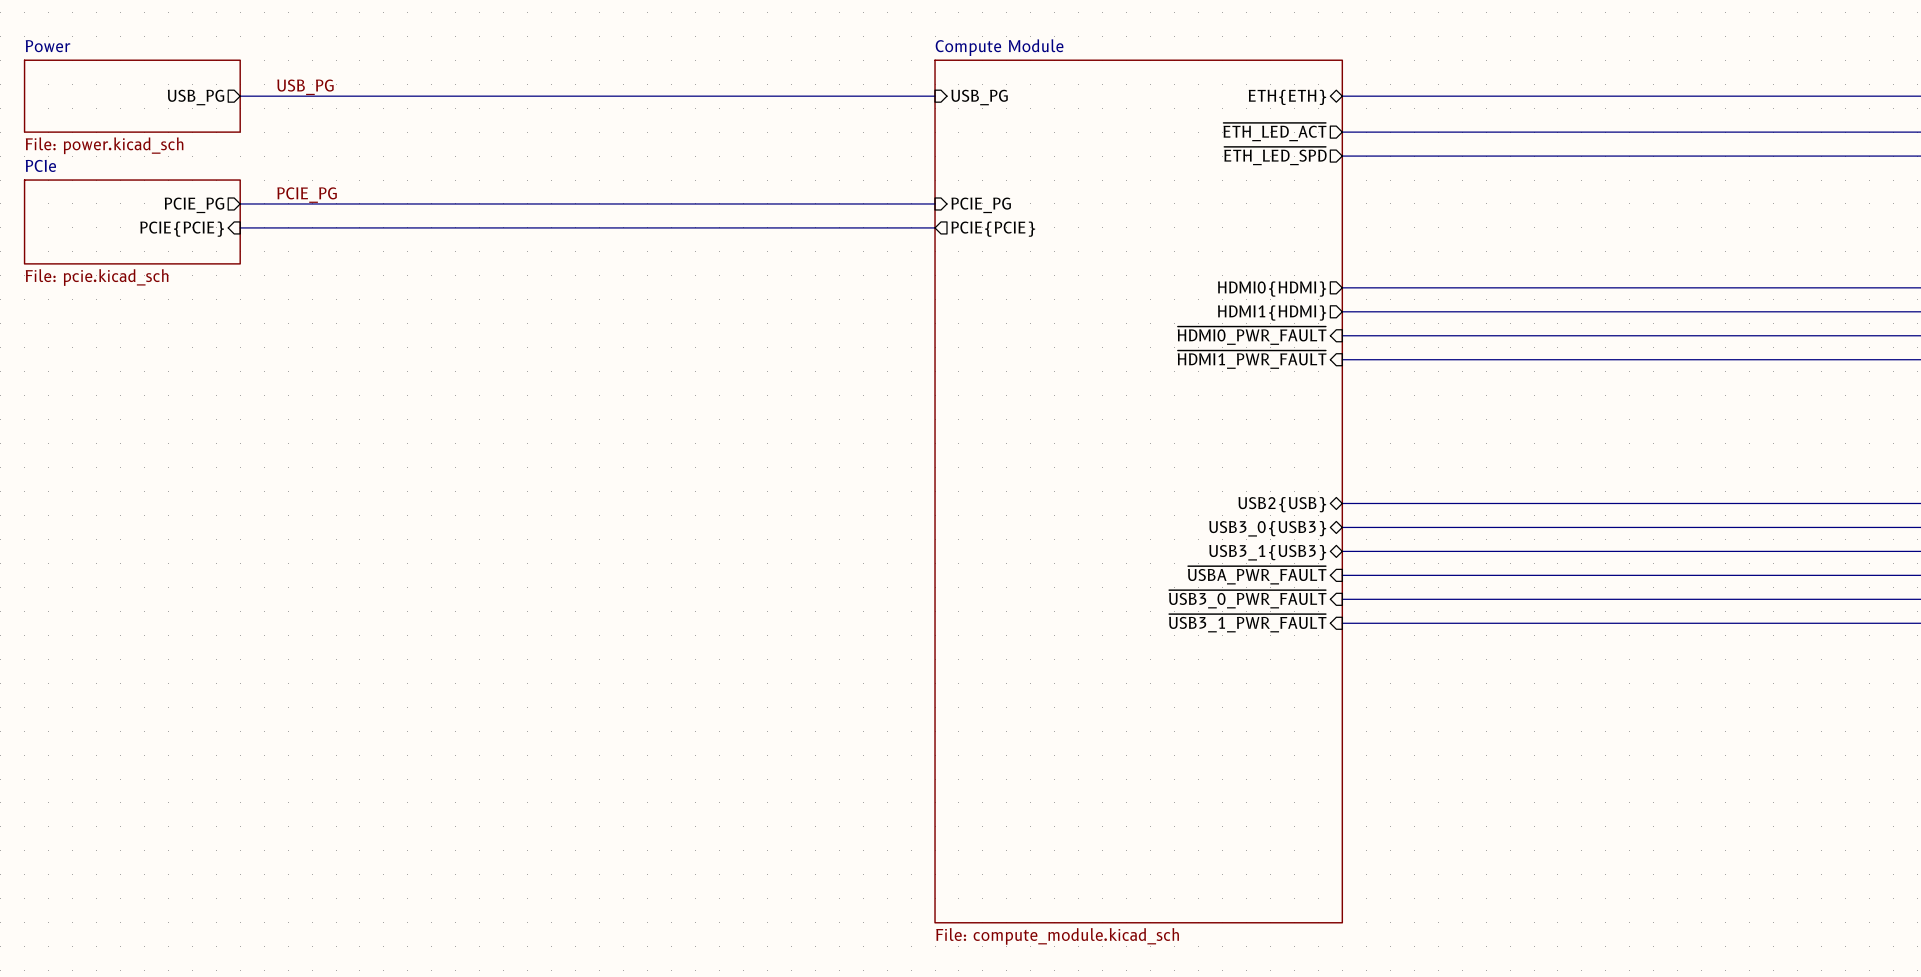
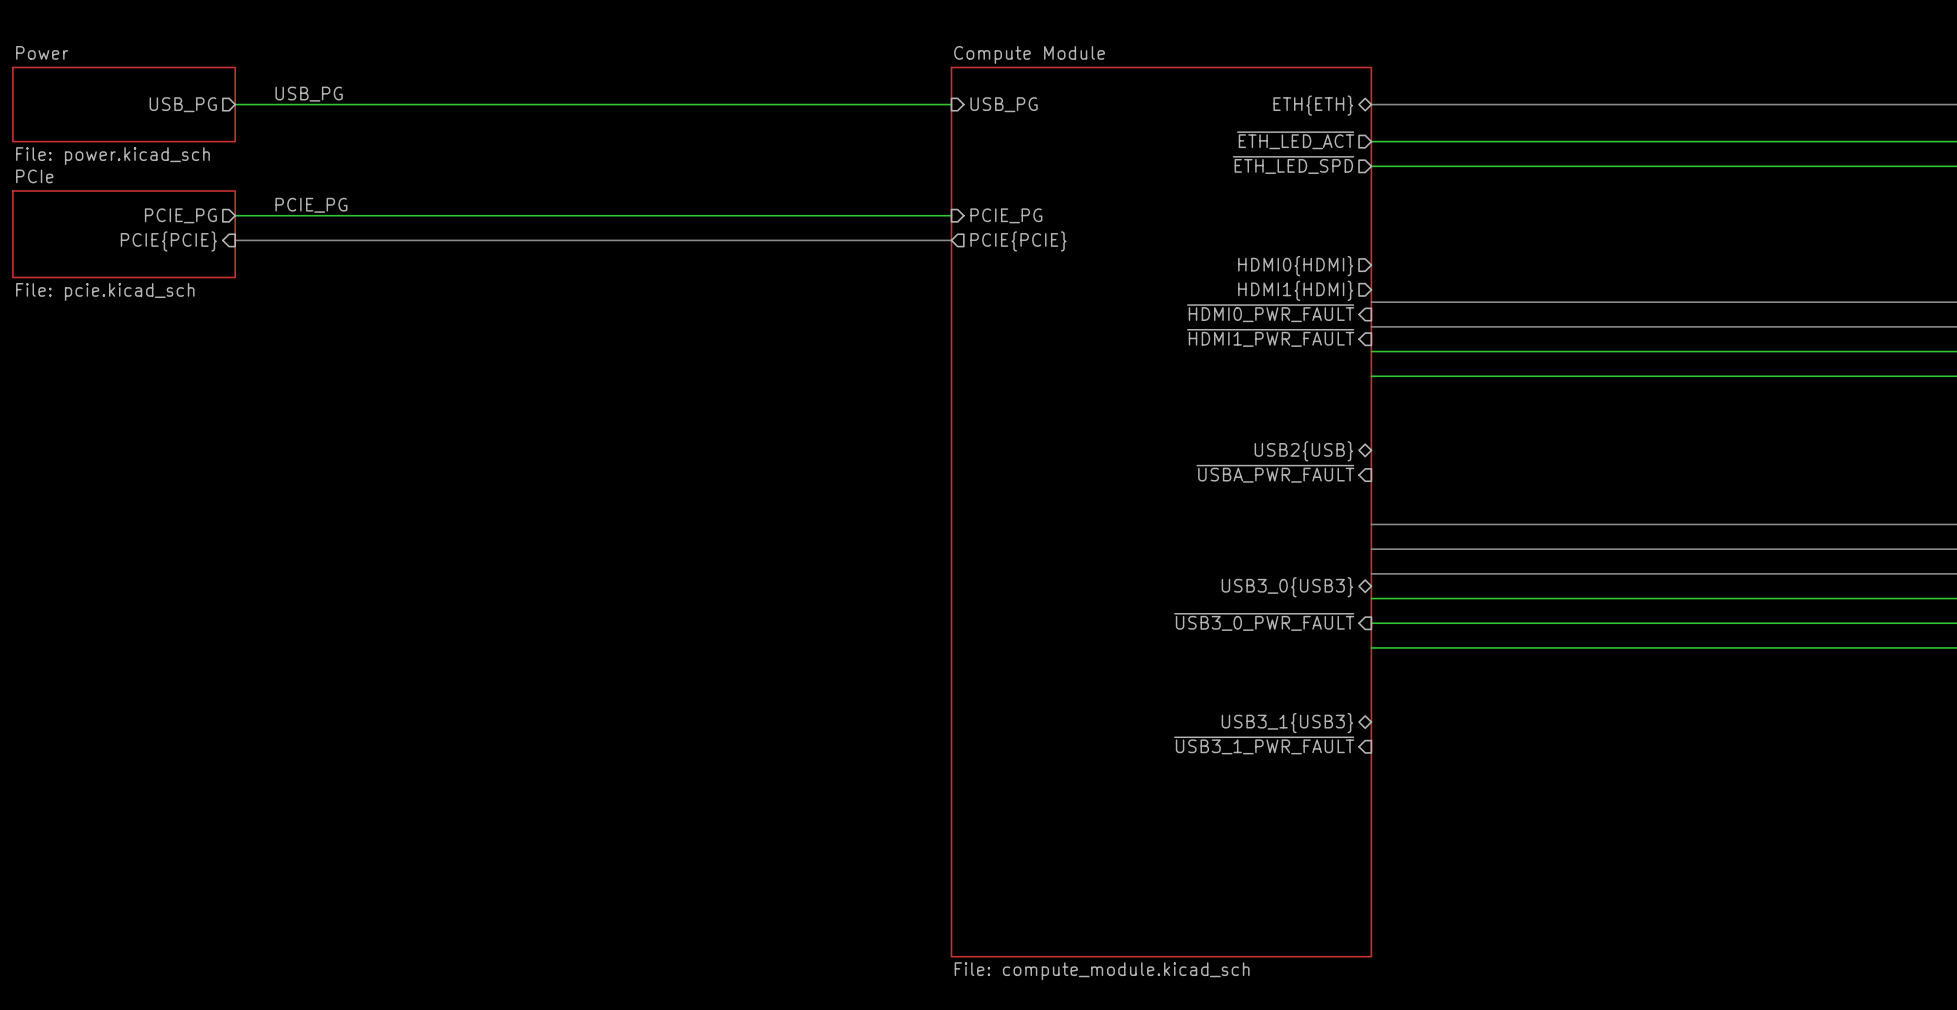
sheet pin position: HDMI0{HDMI} (1272, 289) -> HDMI0{HDMI} (1295, 266)
sheet pin position: HDMI1{HDMI} (1272, 313) -> HDMI1{HDMI} (1295, 290)
sheet pin position: ~{HDMI0_PWR_FAULT} (1252, 335) -> ~{HDMI0_PWR_FAULT} (1270, 313)
sheet pin position: ~{HDMI1_PWR_FAULT} (1252, 359) -> ~{HDMI1_PWR_FAULT} (1270, 337)
sheet pin position: USB2{USB} (1282, 504) -> USB2{USB} (1303, 451)
sheet pin position: USB3_0{USB3} (1267, 528) -> USB3_0{USB3} (1287, 587)
sheet pin position: USB3_1{USB3} (1267, 552) -> USB3_1{USB3} (1287, 723)
sheet pin position: ~{USBA_PWR_FAULT} (1257, 575) -> ~{USBA_PWR_FAULT} (1275, 473)
sheet pin position: ~{USB3_1_PWR_FAULT} (1247, 623) -> ~{USB3_1_PWR_FAULT} (1264, 745)

